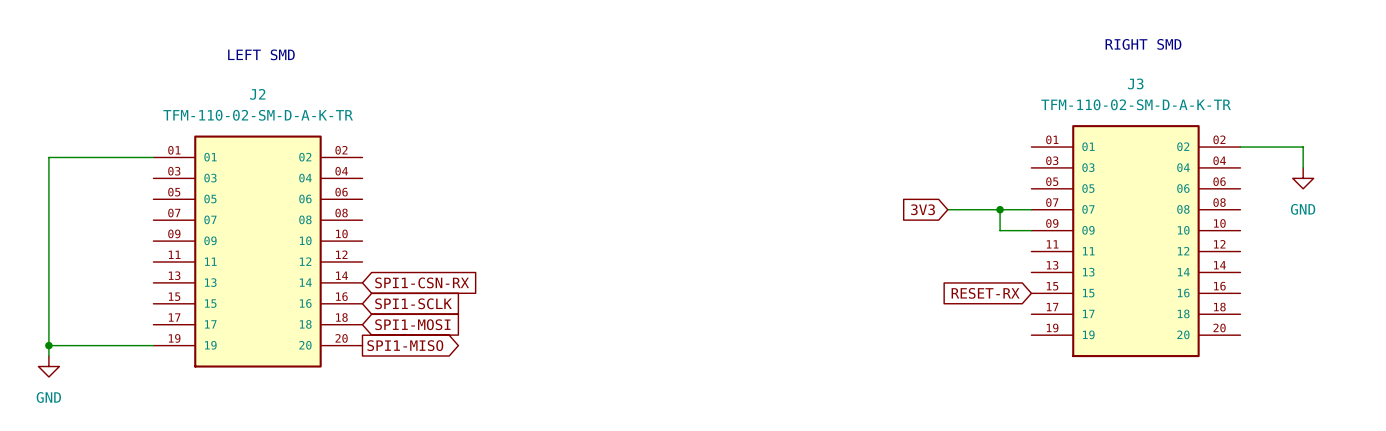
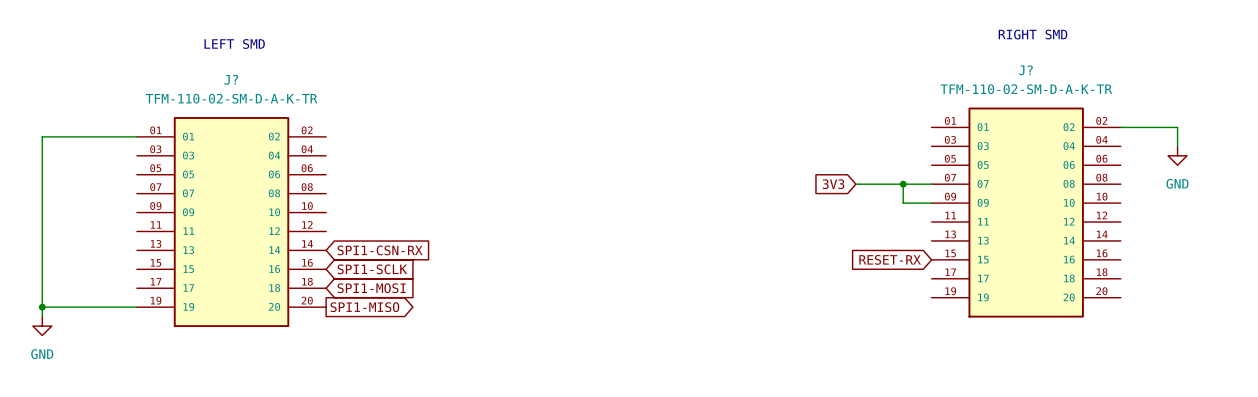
J3 name: J3 (1135, 83) -> J? (1025, 70)
J2 name: J2 (257, 94) -> J? (231, 79)

